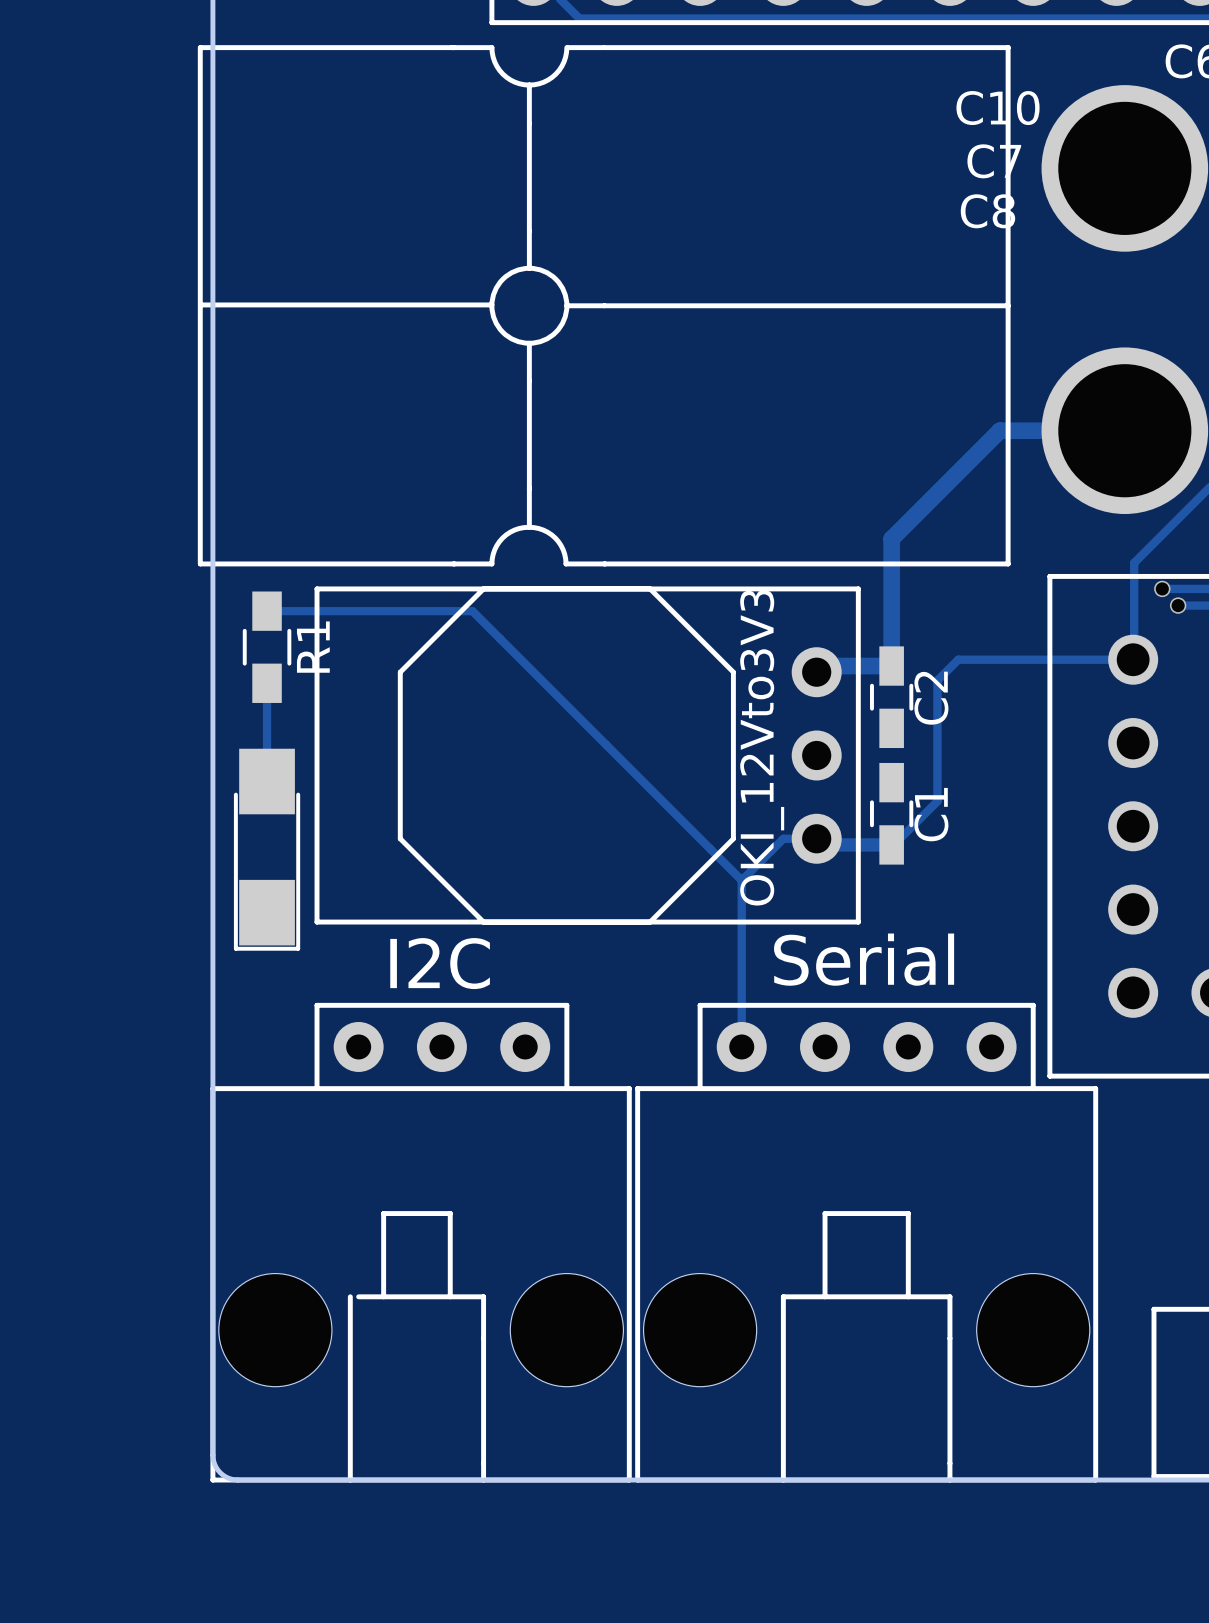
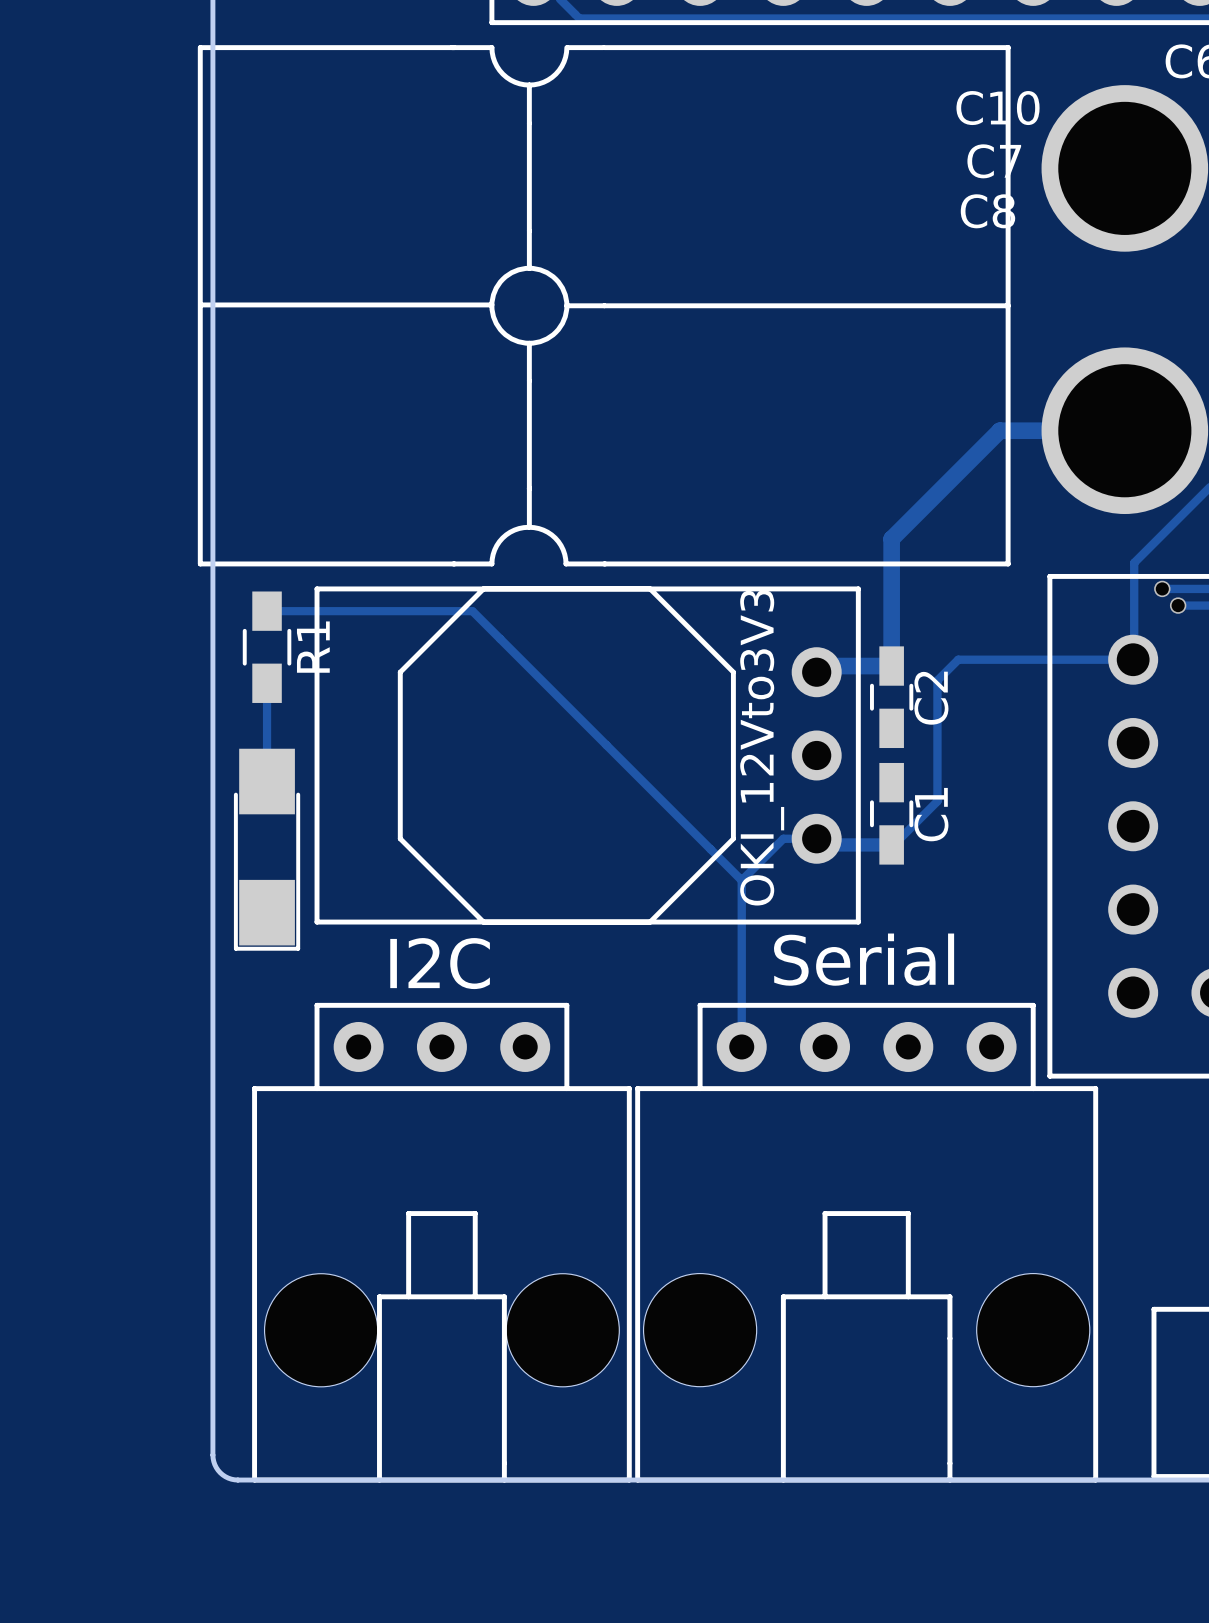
part footprint: [210, 1002, 632, 1483] -> [252, 1002, 632, 1483]

